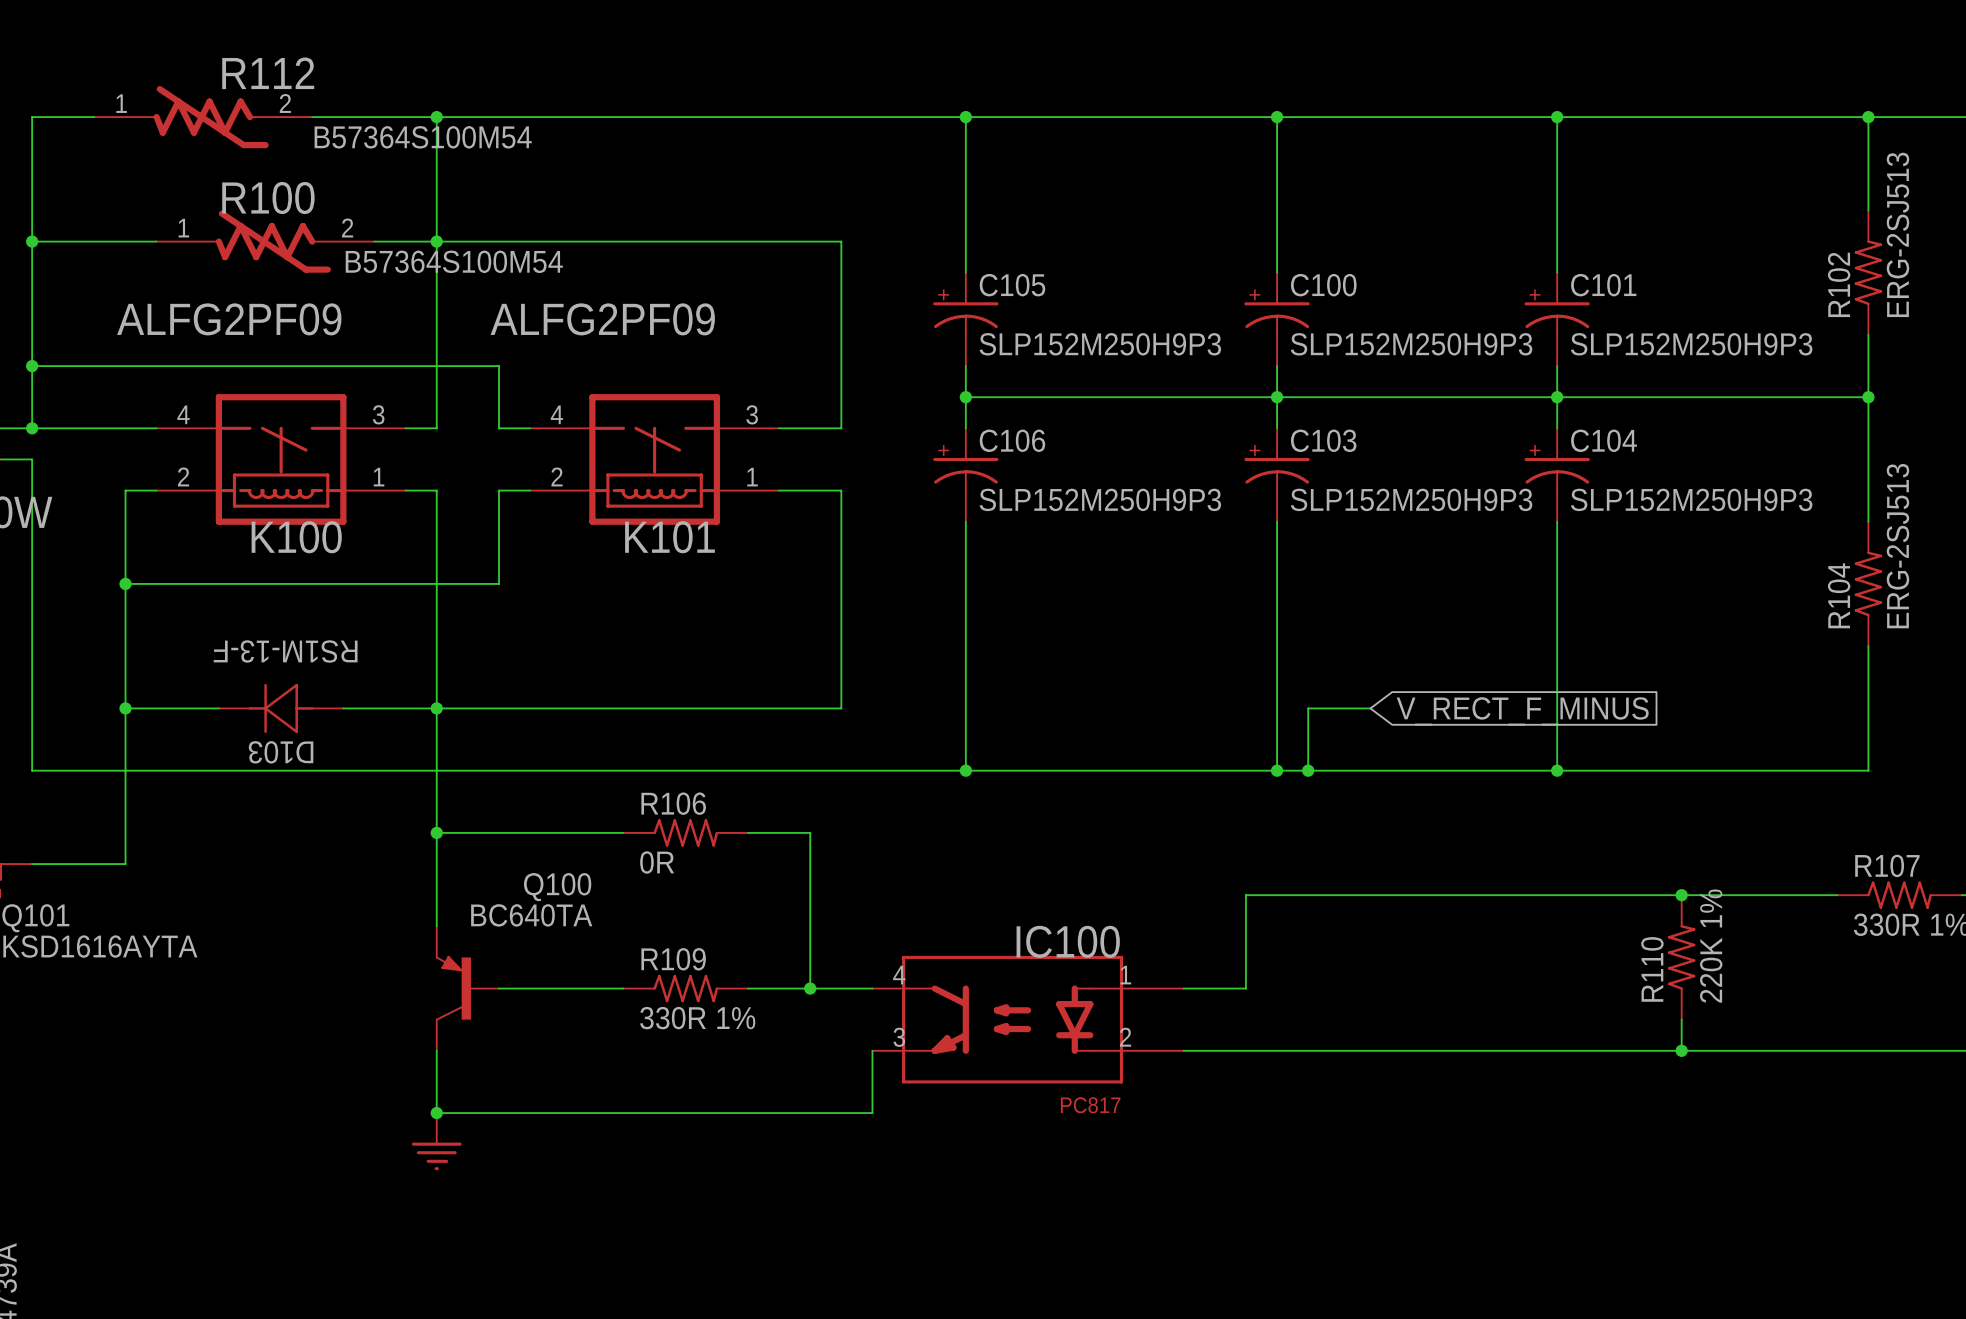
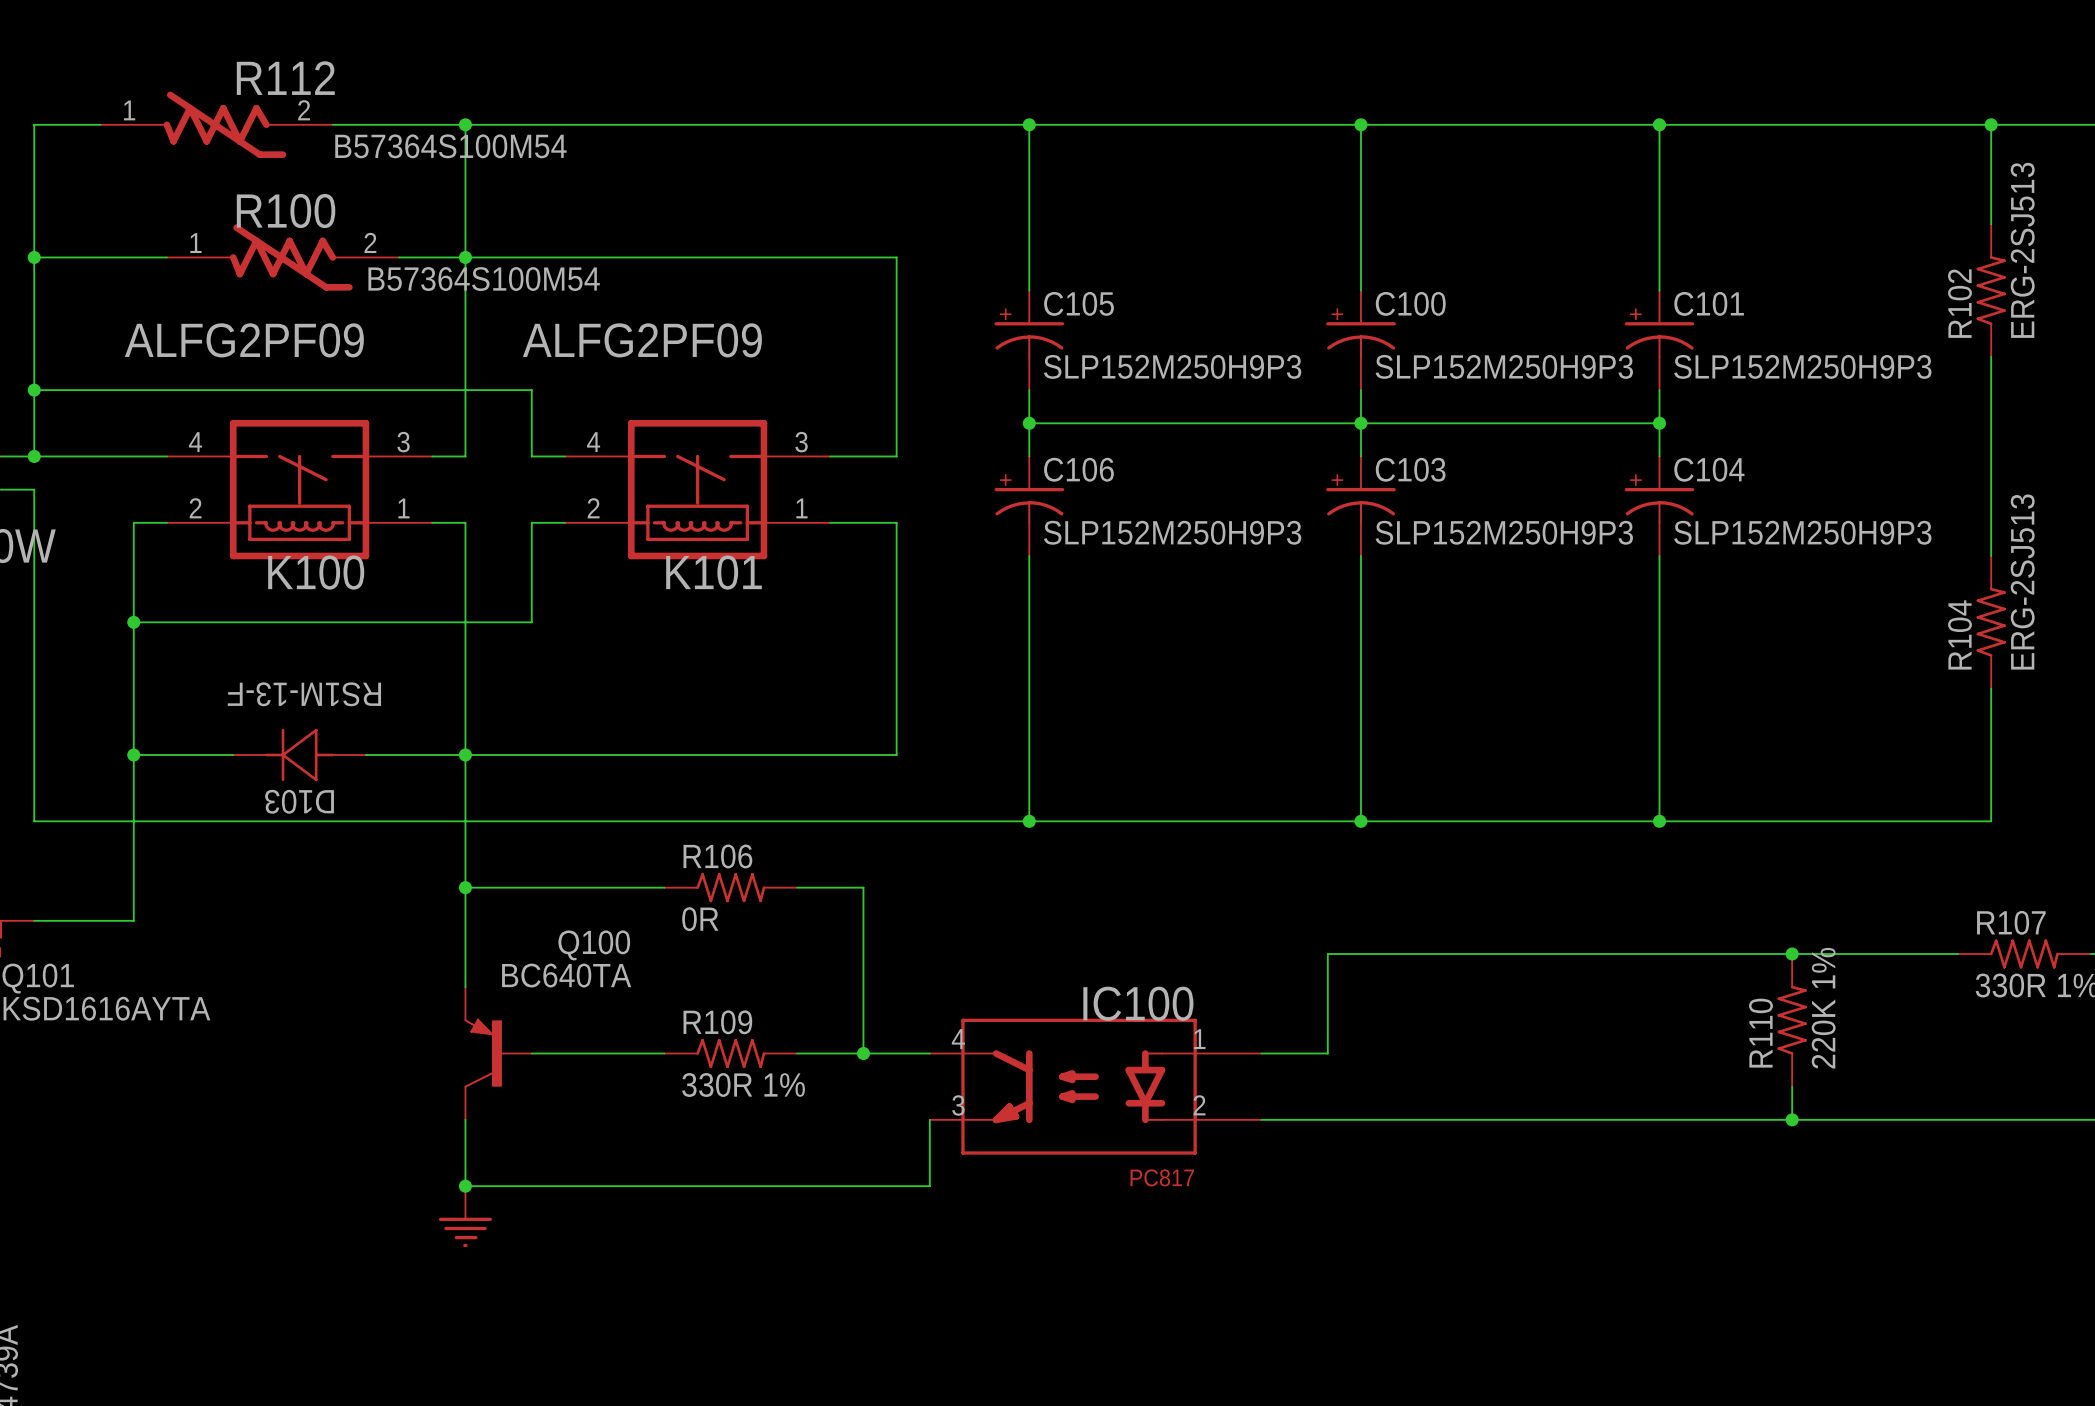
wire: (1557, 397) (1868, 397) -> none
junction: (1868, 397) -> none
wire: (1370, 708) (1308, 708) (1308, 770) -> none
global label: V_RECT_F_MINUS (1522, 711) -> none
junction: (1308, 770) -> none

